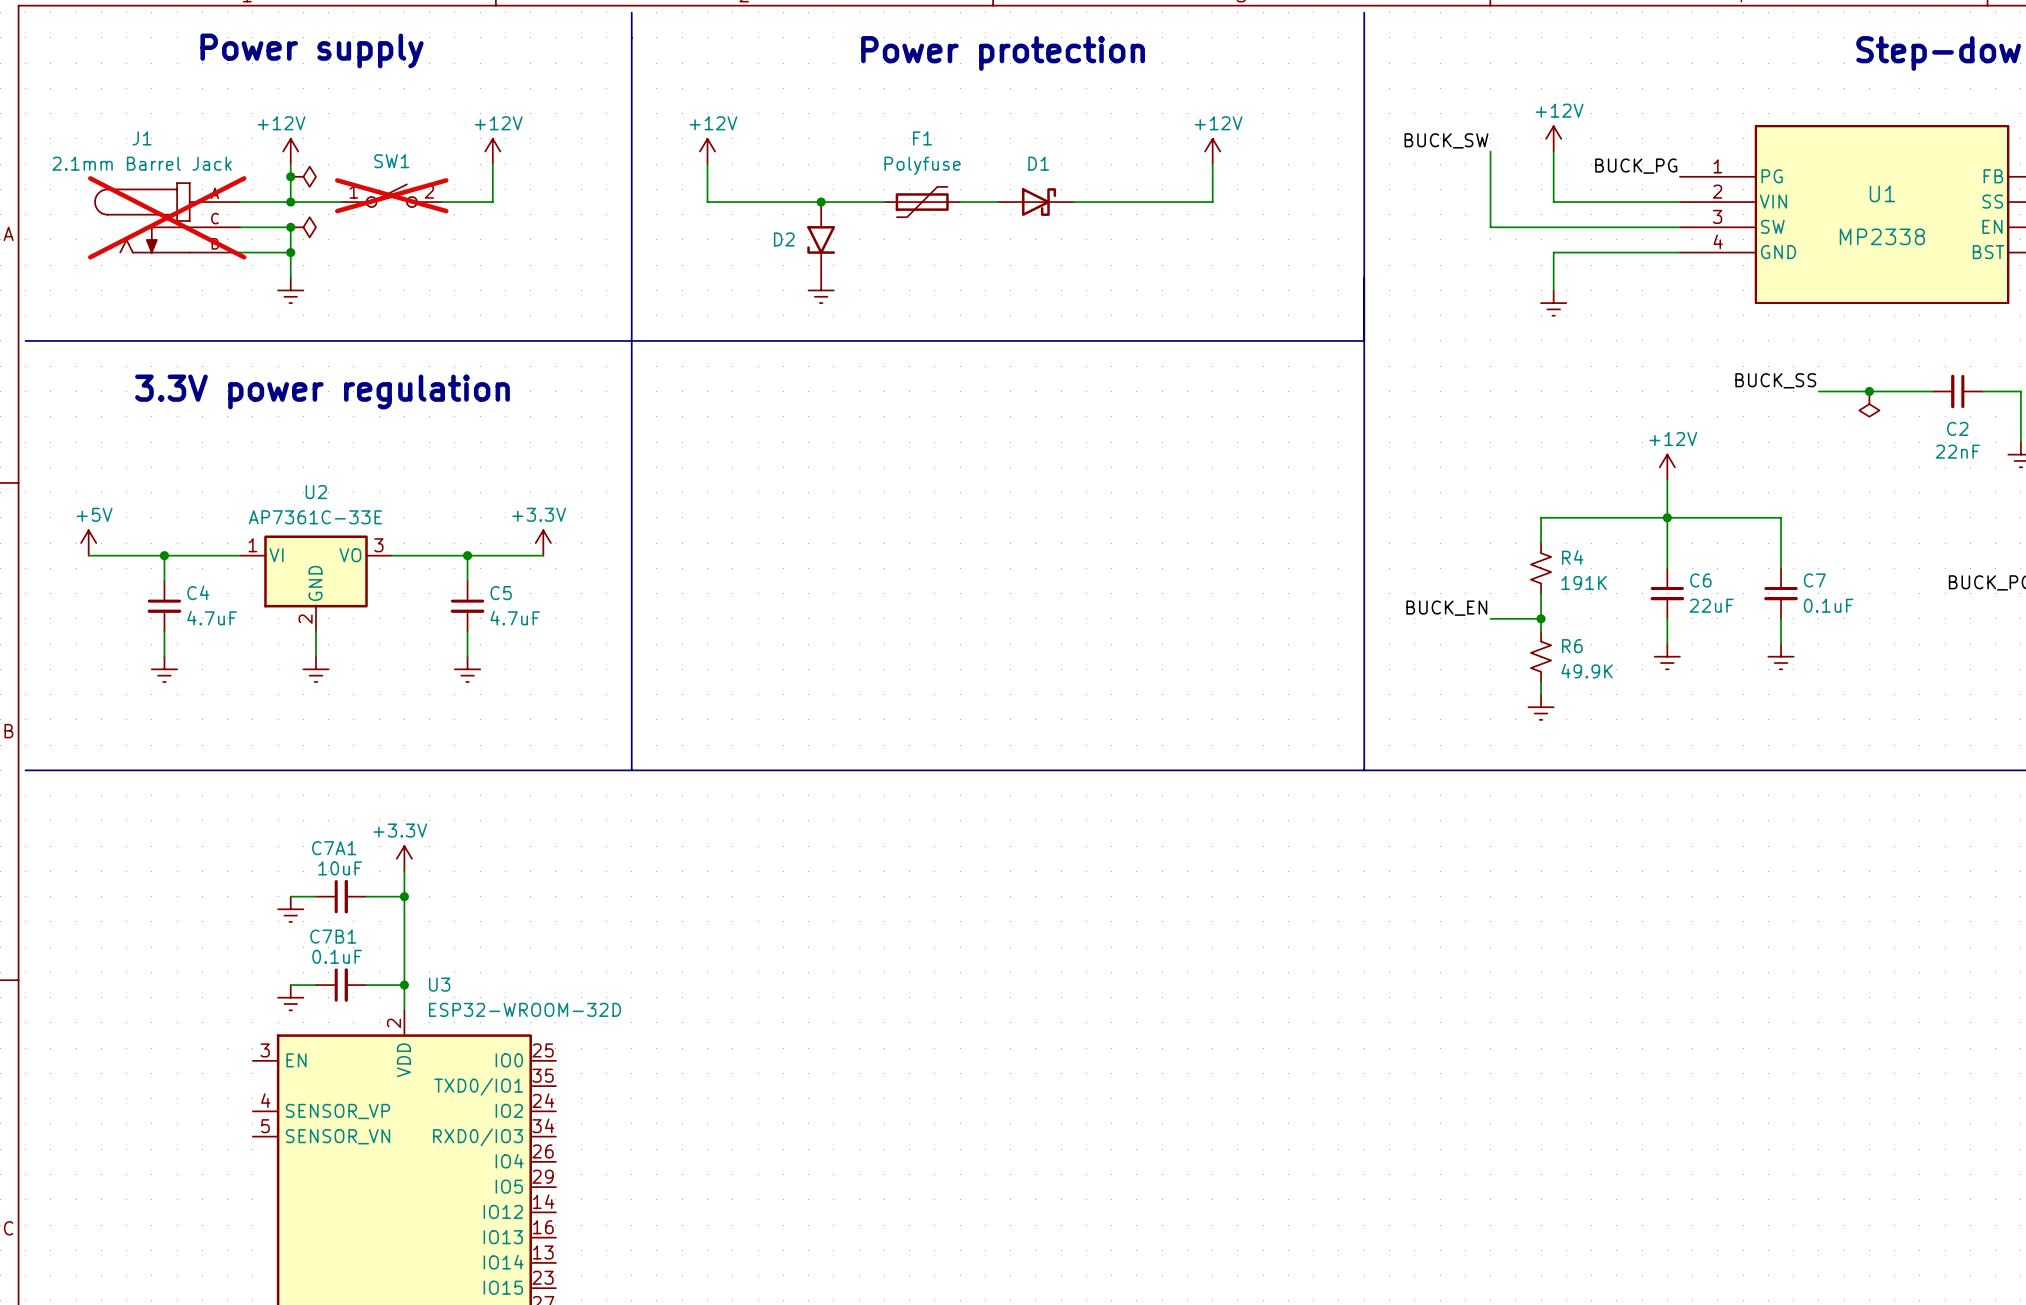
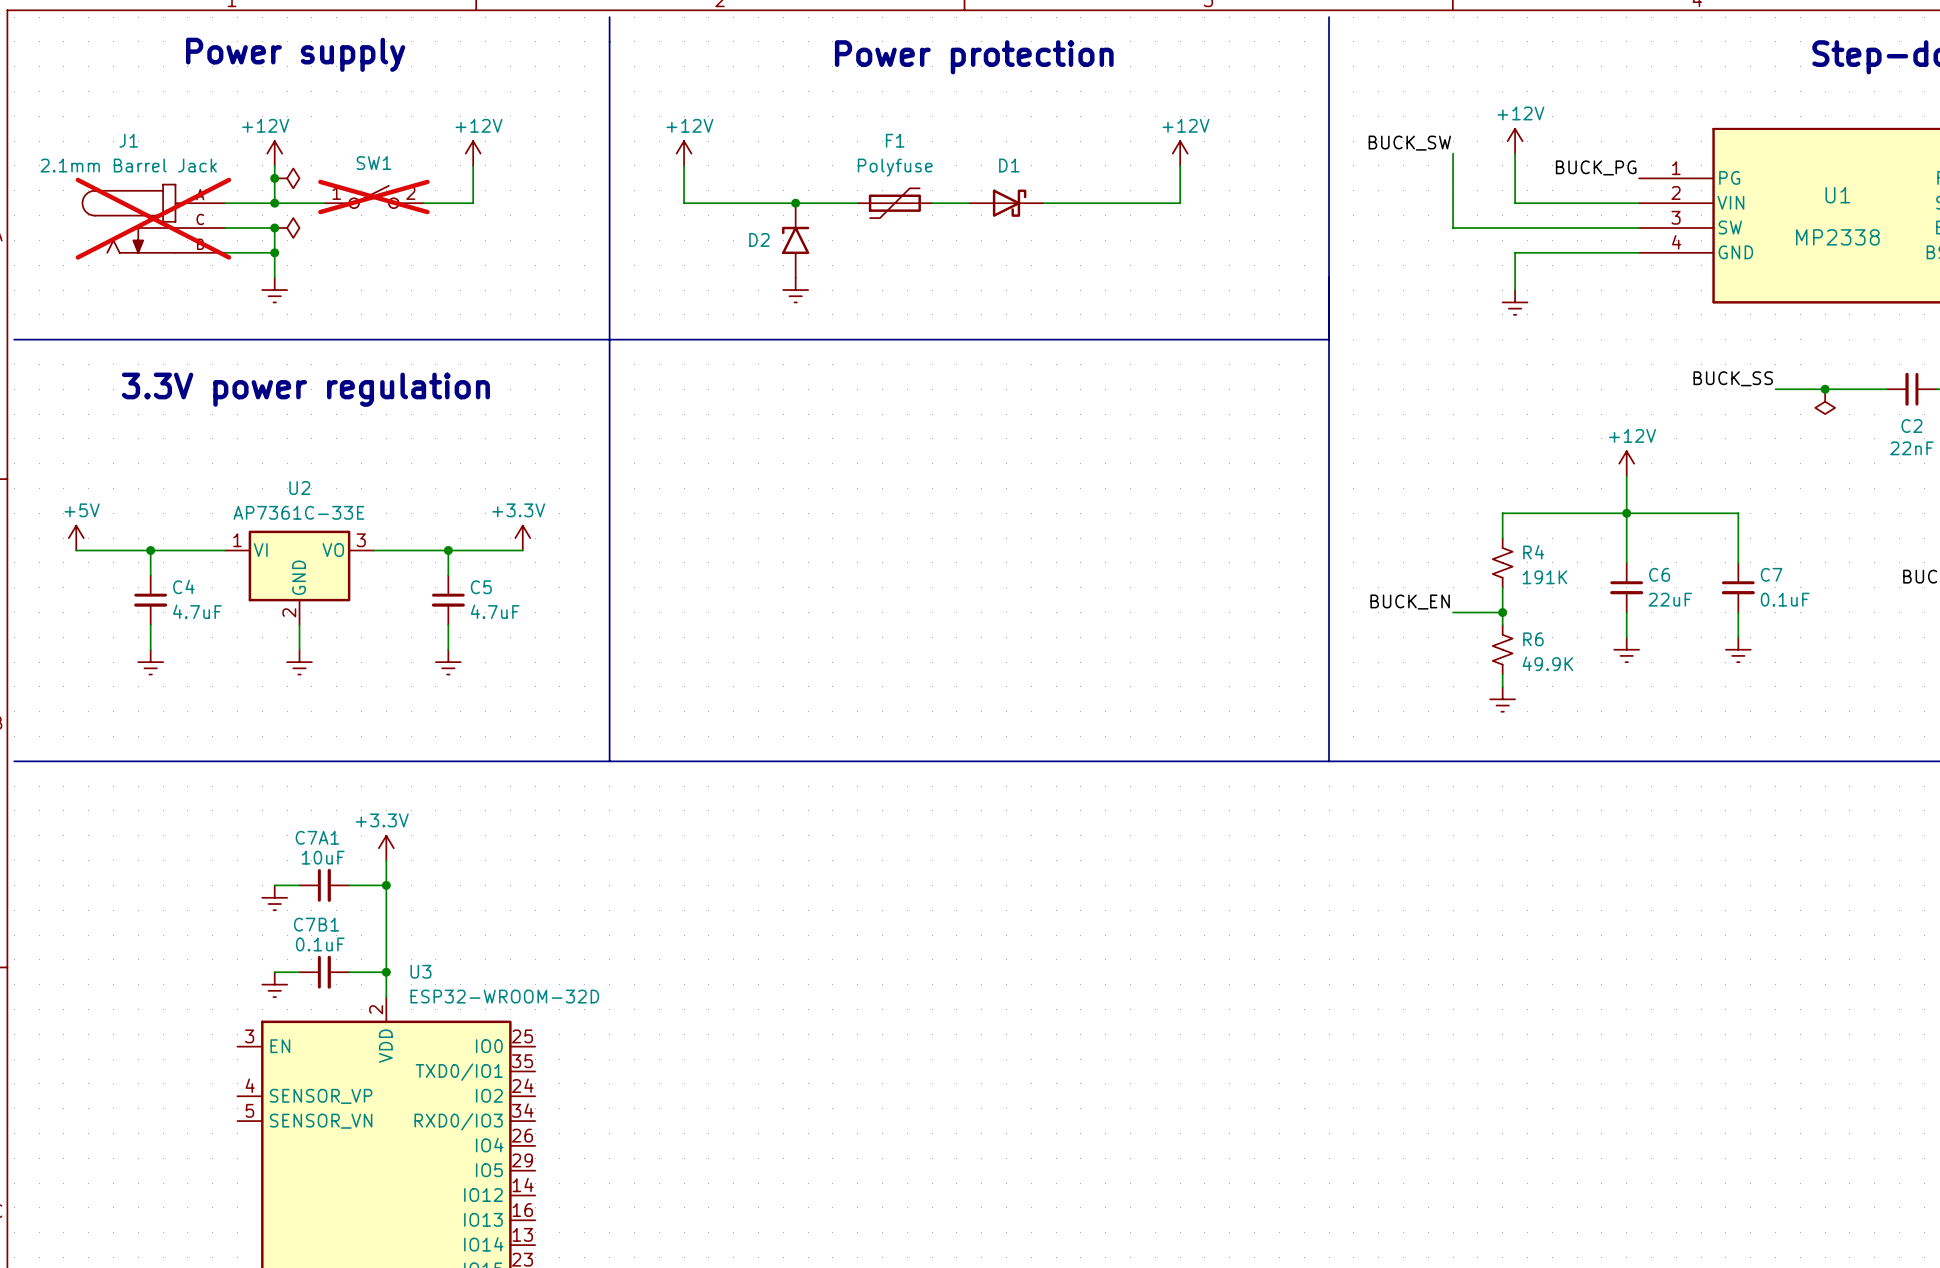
D2 flip: as is (821, 239) -> up-down (795, 240)

